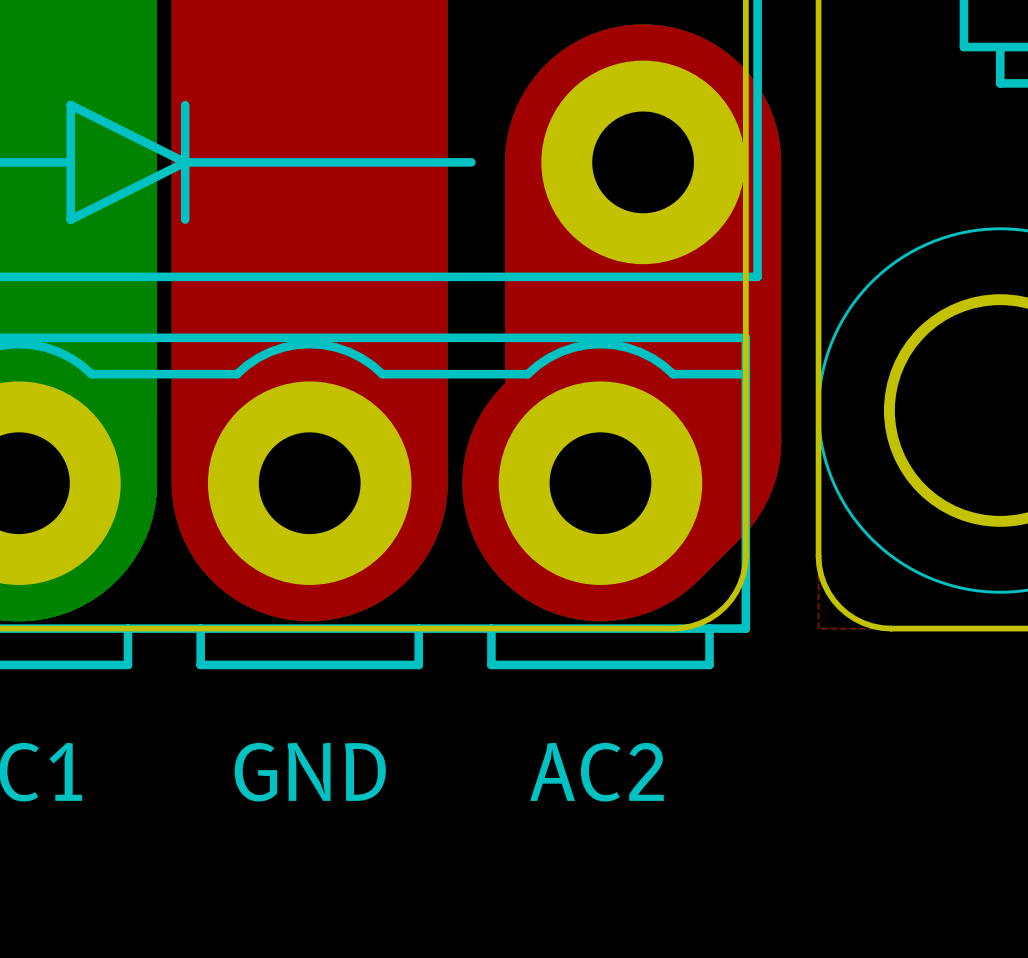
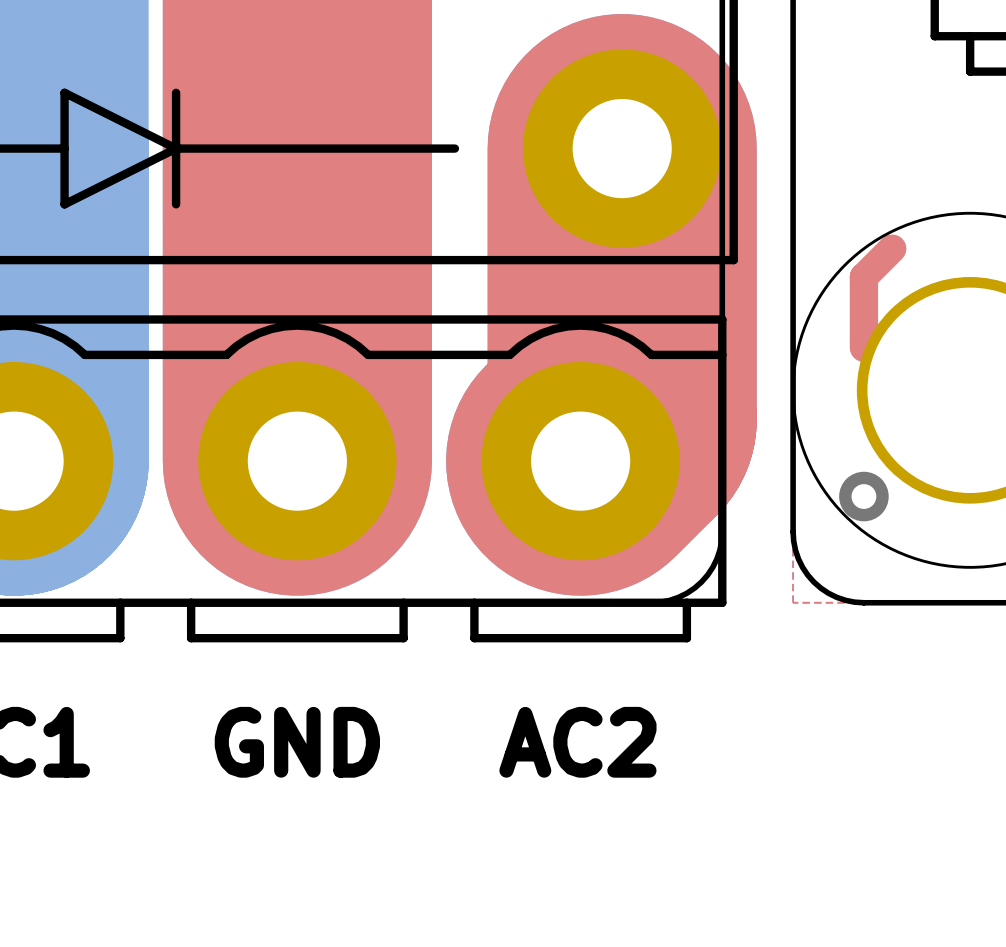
top track: none -> (892, 248) (863, 277) (863, 347)
via: none -> (863, 496)

